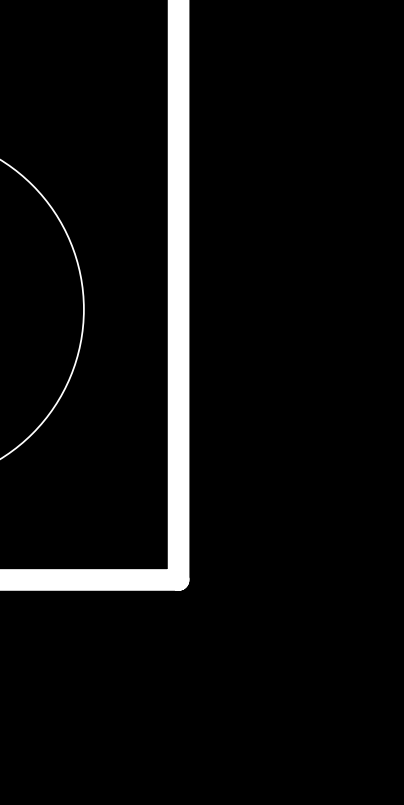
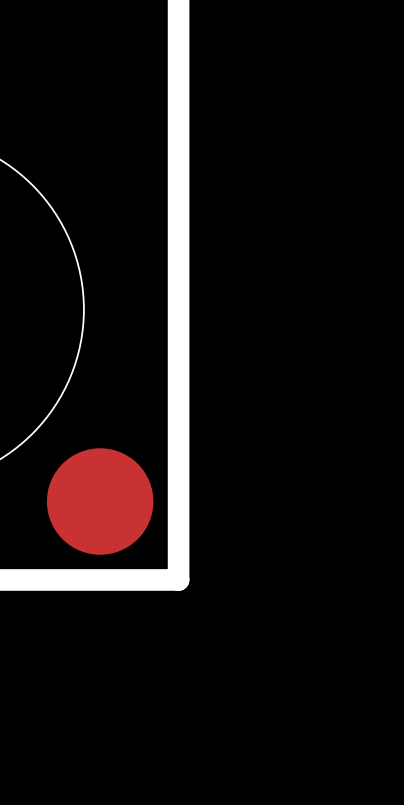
part: none -> (100, 501)

